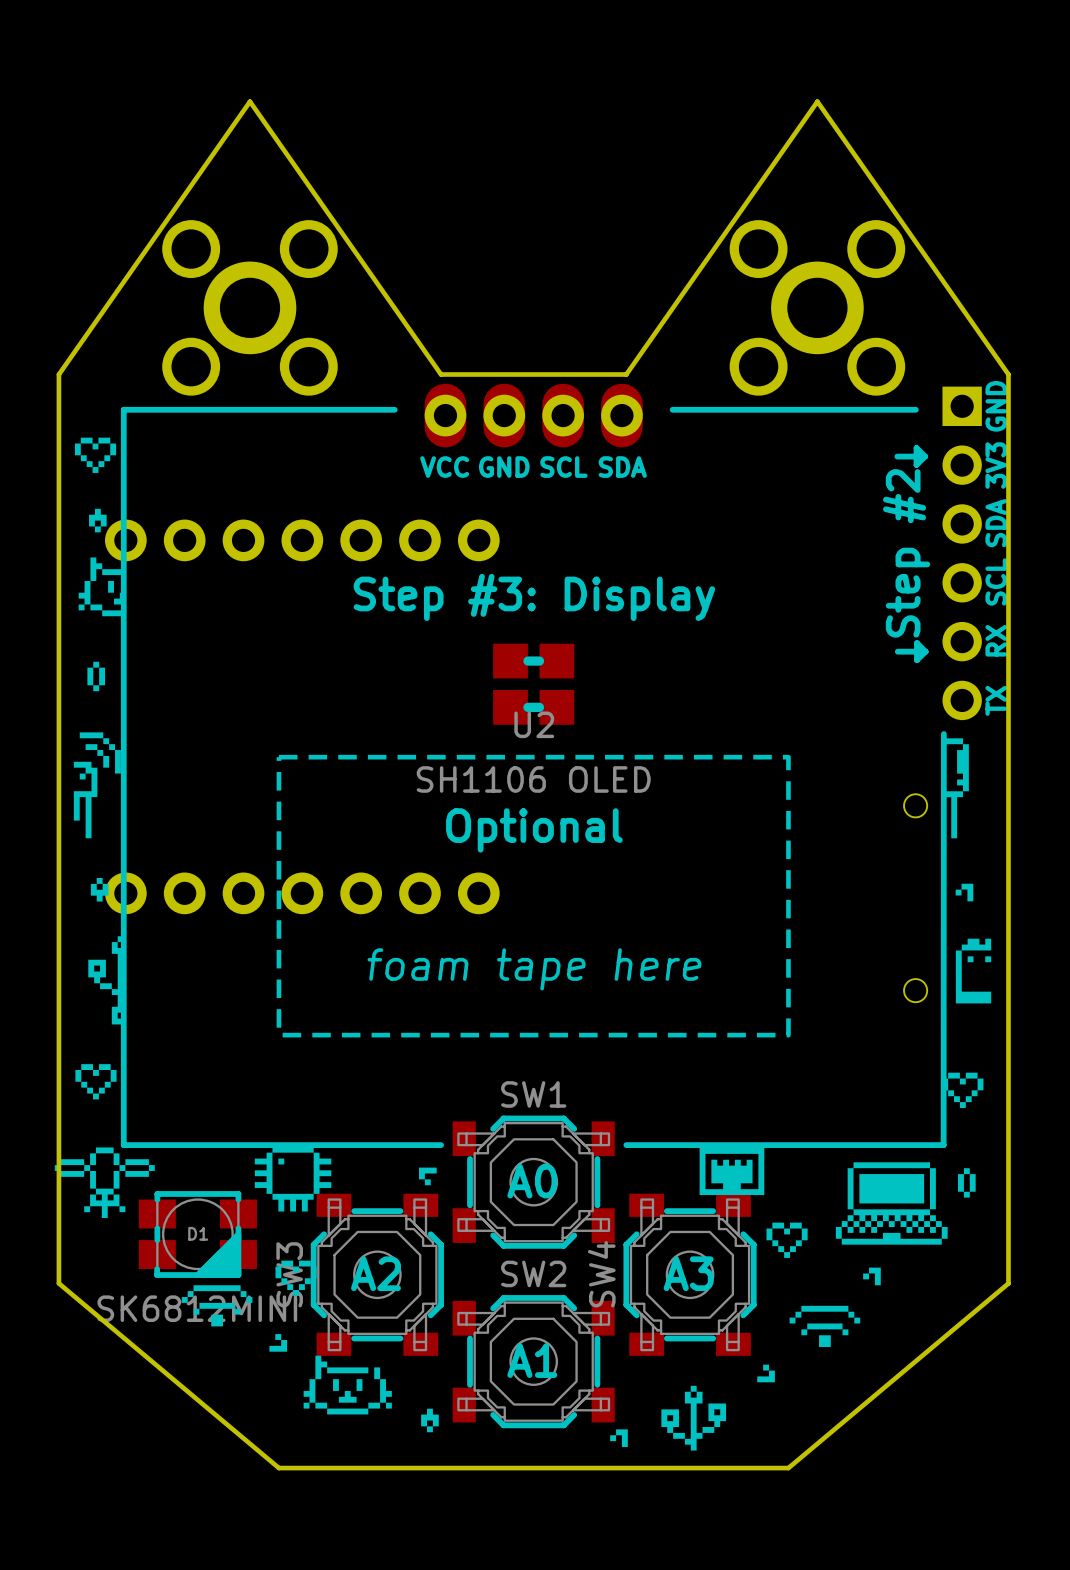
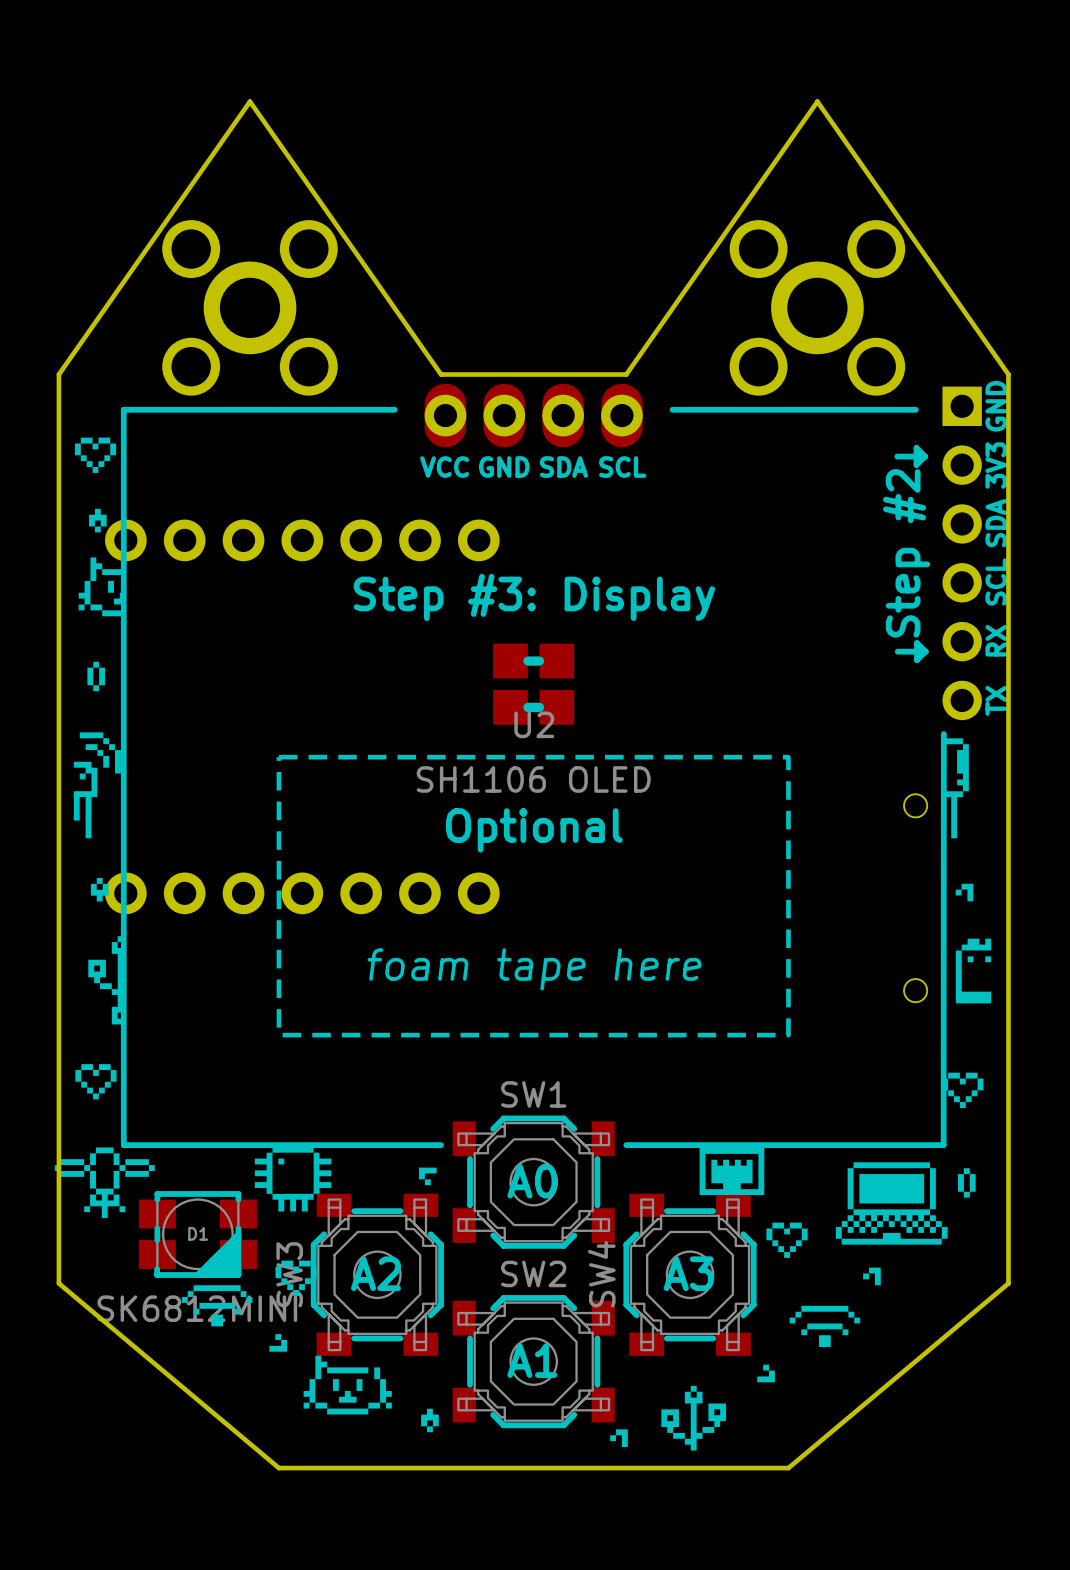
U2 text: SCL (563, 467) -> SDA (563, 467)
U2 text: SDA (622, 467) -> SCL (622, 467)

